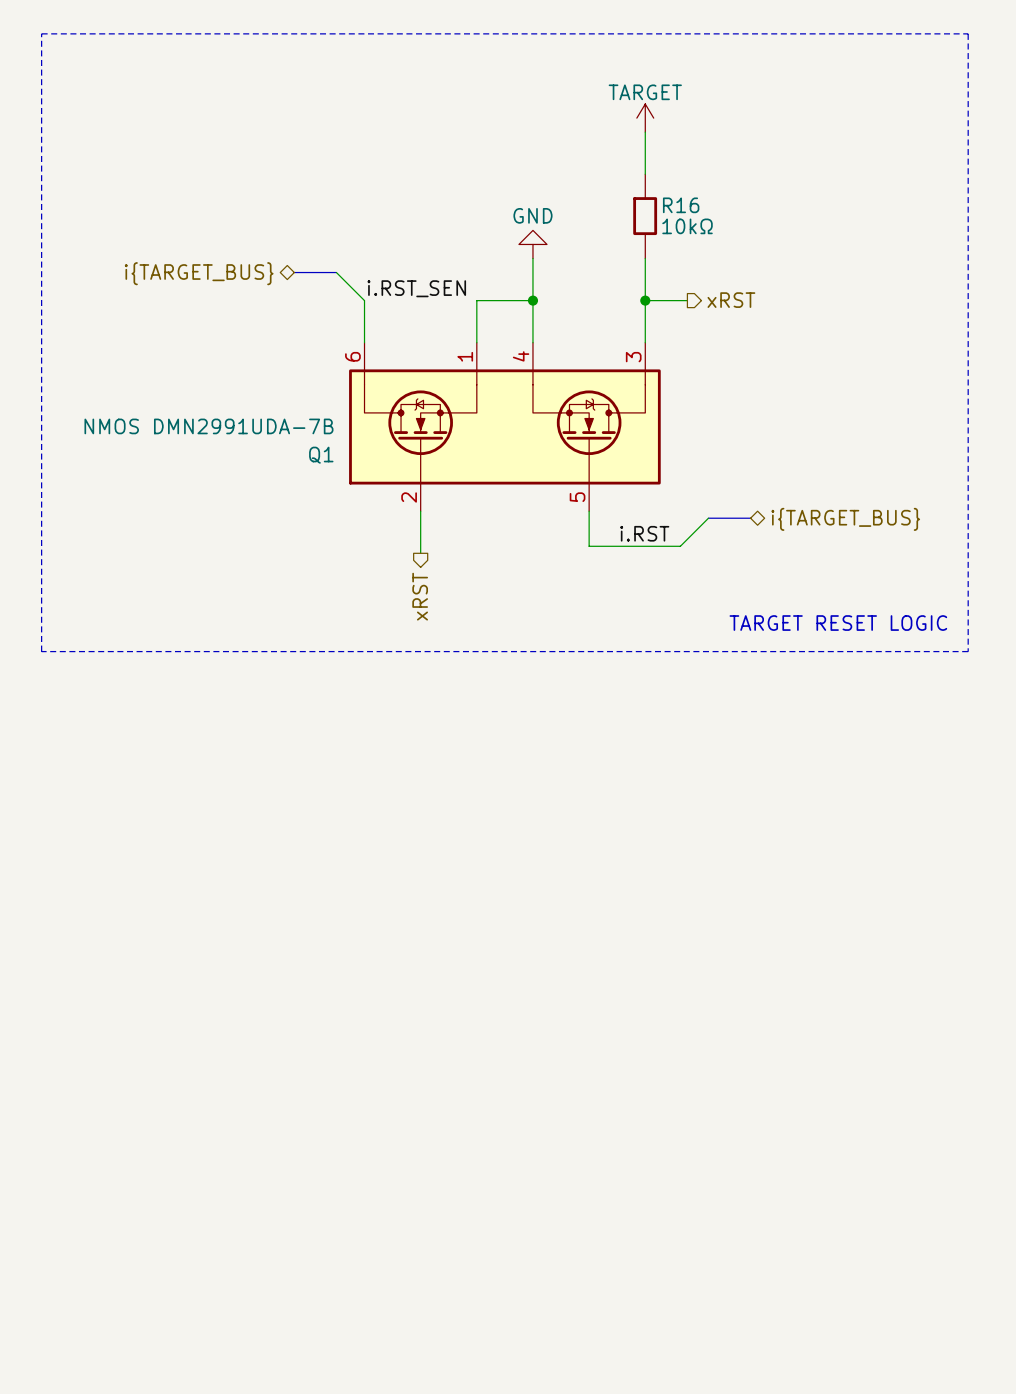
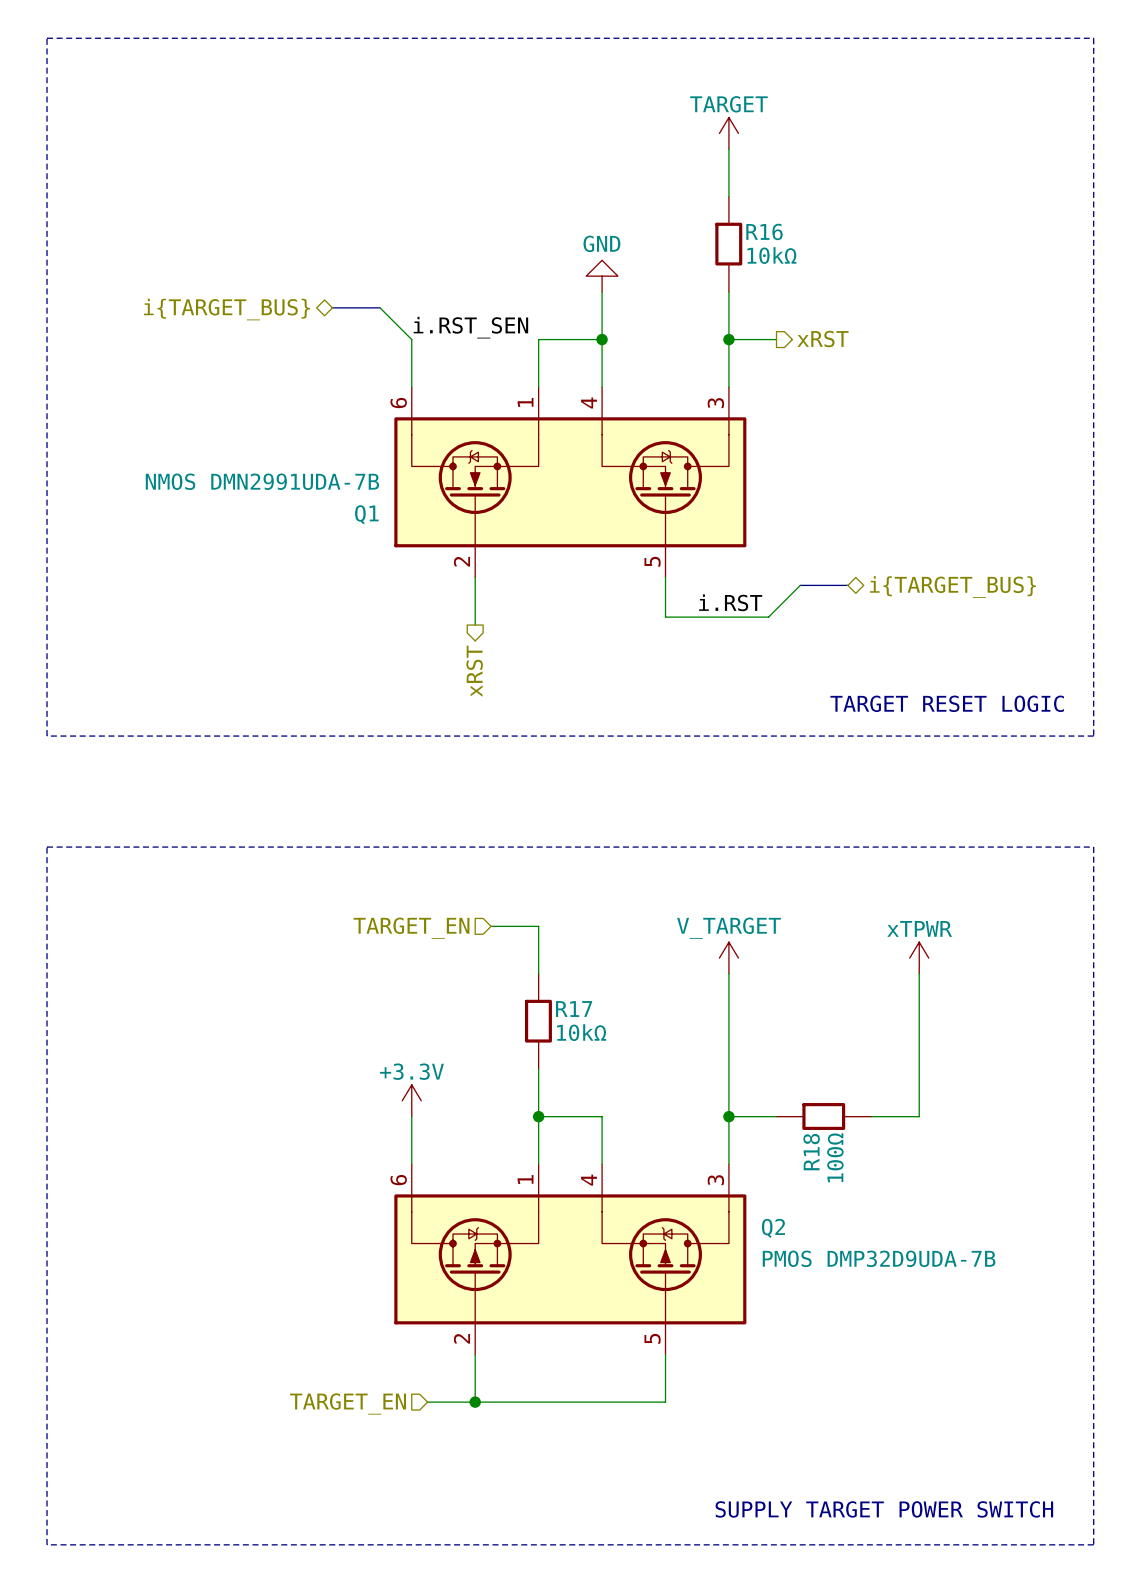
line: none -> (47, 847) (1093, 847) (1093, 1544) (47, 1544) (47, 847)
hierarchical label: none -> TARGET_EN (411, 928)
wire: none -> (491, 926) (538, 926) (538, 973)
power symbol: none -> V_TARGET (728, 958)
power symbol: none -> xTPWR (919, 958)
wire: none -> (728, 973) (728, 1164)
wire: none -> (919, 973) (919, 1116) (871, 1116)
R17: none -> 10kΩ (538, 1021)
wire: none -> (538, 1069) (538, 1164)
power symbol: none -> +3.3V (411, 1100)
wire: none -> (411, 1116) (411, 1164)
wire: none -> (538, 1116) (602, 1116) (602, 1164)
junction: none -> (538, 1116)
wire: none -> (728, 1116) (776, 1116)
junction: none -> (728, 1116)
R18: none -> 100Ω (824, 1116)
Q2: none -> PMOS DMP32D9UDA-7B (570, 1259)
wire: none -> (475, 1354) (475, 1402)
wire: none -> (665, 1354) (665, 1402) (427, 1402)
hierarchical label: none -> TARGET_EN (348, 1403)
junction: none -> (475, 1402)
text: none -> SUPPLY TARGET POWER SWITCH (884, 1509)

